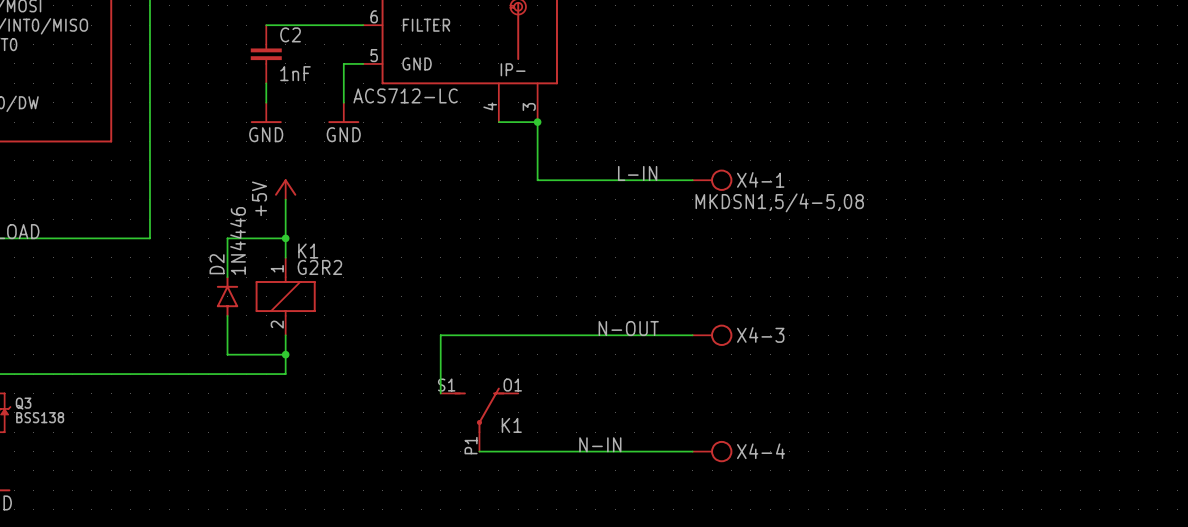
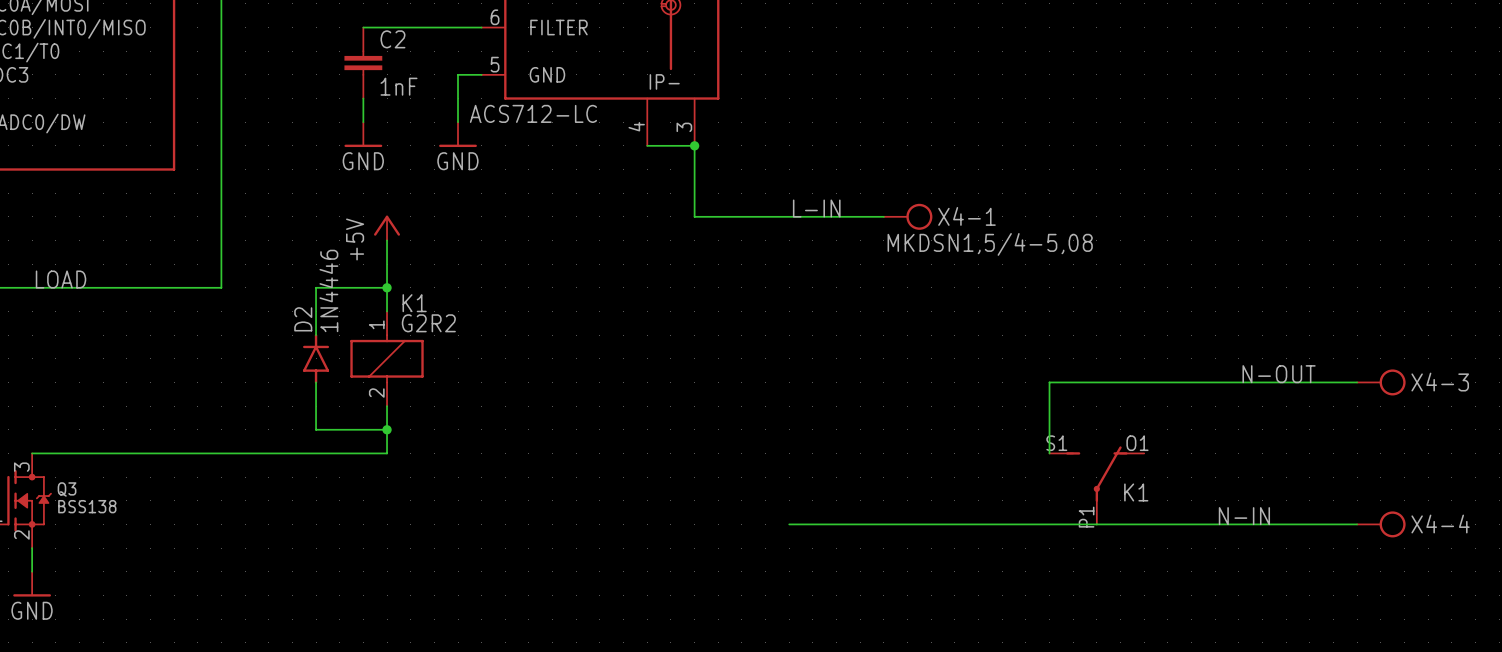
label: none -> N-OUT (1279, 374)
wire: none -> (1357, 382) (1049, 382) (1049, 453)
label: N-OUT (628, 328) -> none
wire: (692, 335) (440, 335) (440, 393) -> none
X4-3 position: (712, 335) -> (1381, 382)
K1: none -> (1096, 485)
K1: (479, 419) -> none
label: none -> N-IN (1244, 516)
wire: none -> (789, 524) (1357, 524)
label: N-IN (600, 444) -> none
wire: (479, 451) (692, 451) -> none
X4-4 position: (712, 451) -> (1381, 524)

